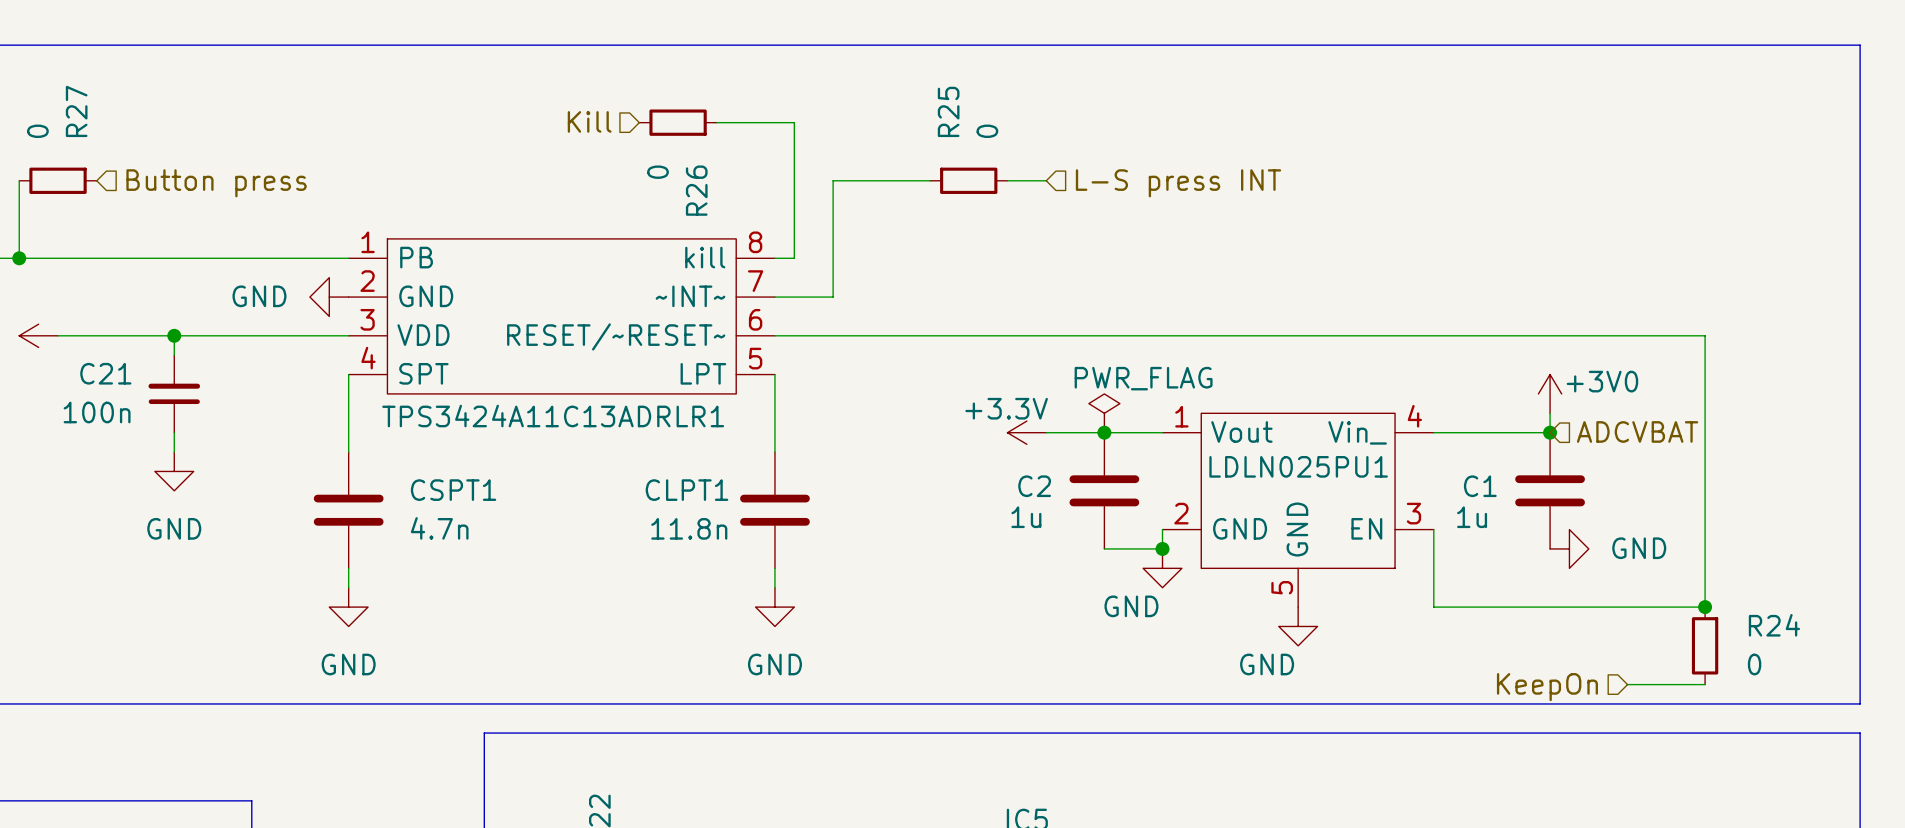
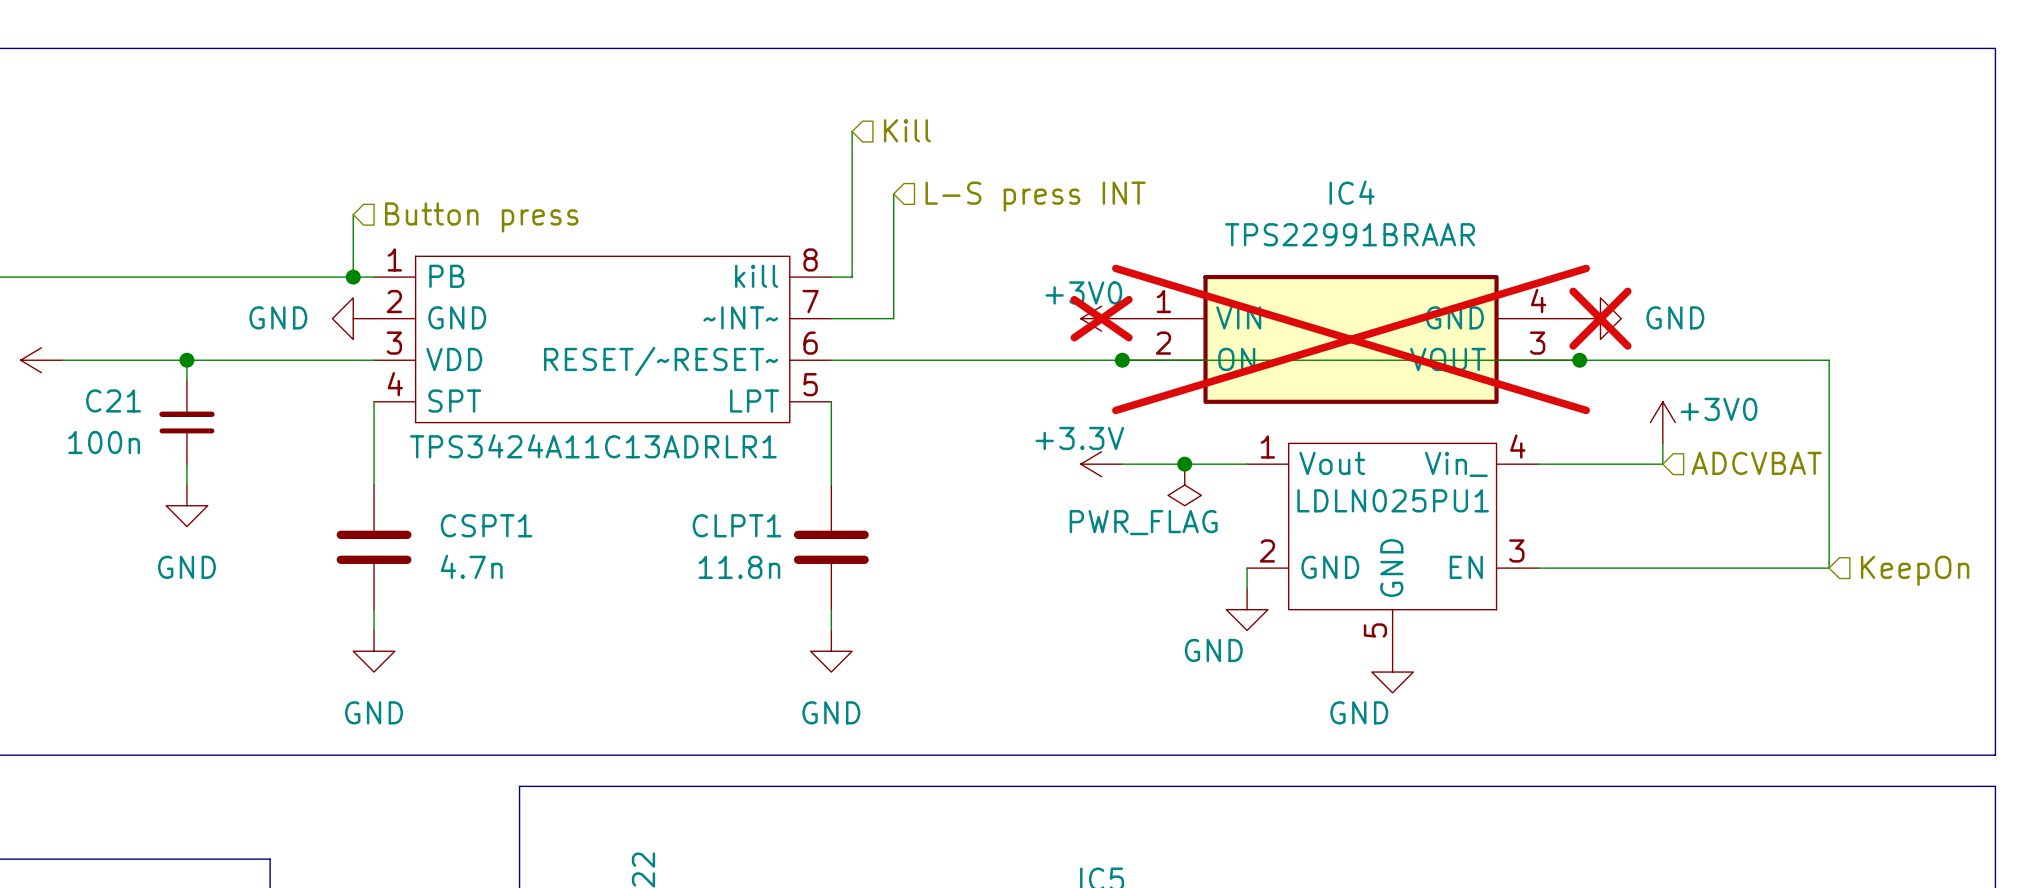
hierarchical label rotation: 0° (589, 121) -> 180° (907, 130)
hierarchical label position: Kill (589, 121) -> Kill (907, 130)
R26: 0 (678, 122) -> none
wire: (716, 122) (794, 122) -> none
wire: (19, 180) (19, 258) -> none
R27: 0 (58, 180) -> none
wire: (833, 180) (929, 180) -> none
R25: 0 (968, 180) -> none
wire: (1007, 180) (1046, 180) -> none
hierarchical label position: Button press (216, 183) -> Button press (481, 217)
hierarchical label position: L-S press INT (1178, 183) -> L-S press INT (1035, 196)
wire: none -> (353, 214) (353, 277)
junction: (19, 258) -> none
junction: none -> (353, 277)
power symbol: none -> +3V0 (1101, 318)
power symbol do-not-place cross: none -> (1600, 318)
IC4: none -> TPS22991BRAAR (1351, 339)
junction: none -> (1122, 360)
junction: none -> (1579, 360)
power symbol rotation: 0° (1104, 413) -> 180° (1184, 484)
power symbol position: PWR_FLAG (1104, 413) -> PWR_FLAG (1184, 484)
junction: (1550, 432) -> none
C2: 1u (1104, 490) -> none
C1: 1u (1550, 490) -> none
wire: (1433, 529) (1433, 607) (1705, 607) (1705, 529) -> (1538, 568) (1829, 568)
wire: (1104, 548) (1162, 548) -> none
junction: (1162, 548) -> none
power symbol position: GND (1569, 548) -> GND (1600, 318)
junction: (1705, 607) -> none
R24: 0 (1705, 645) -> none
wire: (1627, 684) (1705, 684) -> none
hierarchical label rotation: 0° (1547, 687) -> 180° (1915, 570)
hierarchical label position: KeepOn (1547, 687) -> KeepOn (1915, 570)

